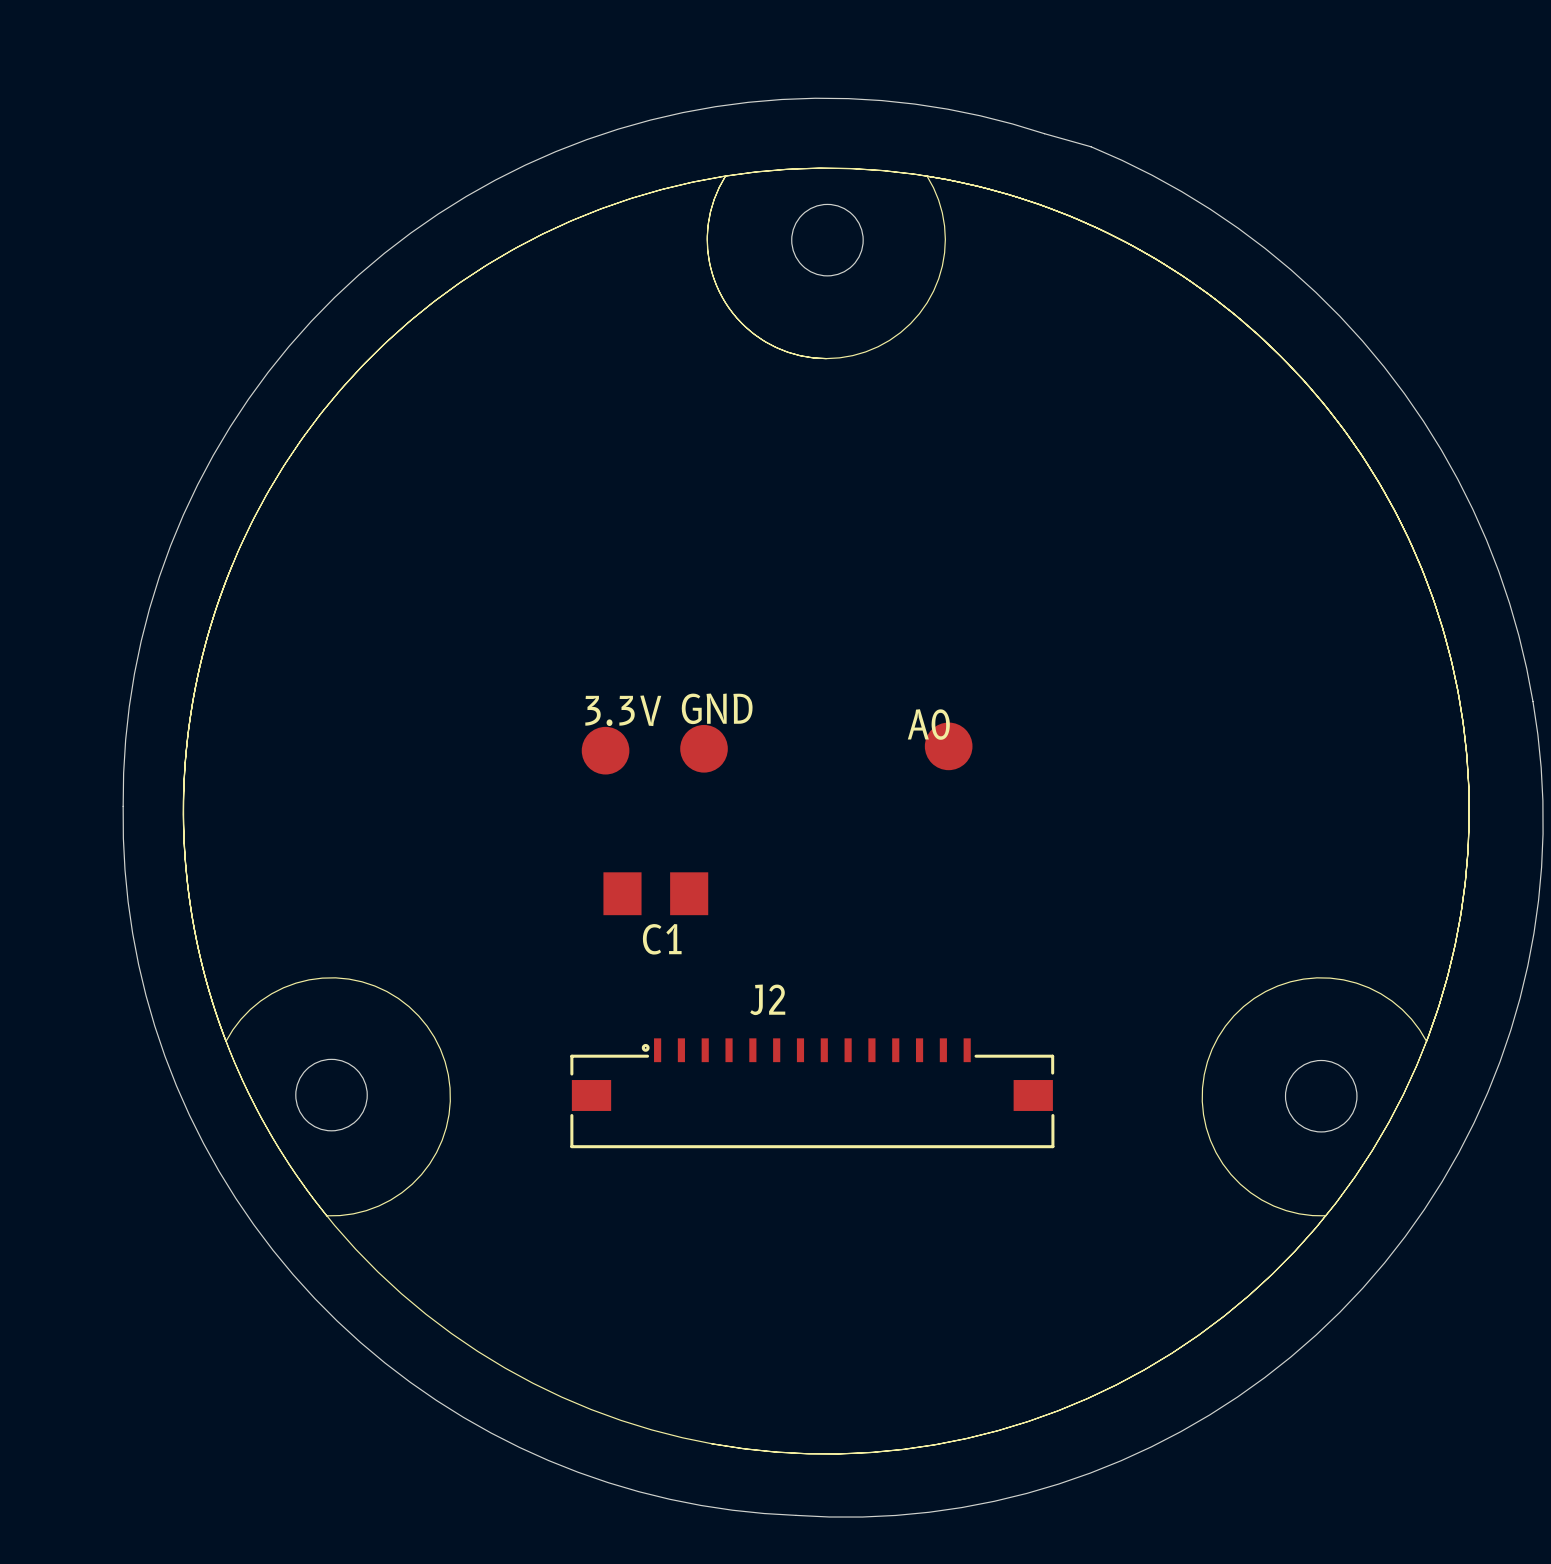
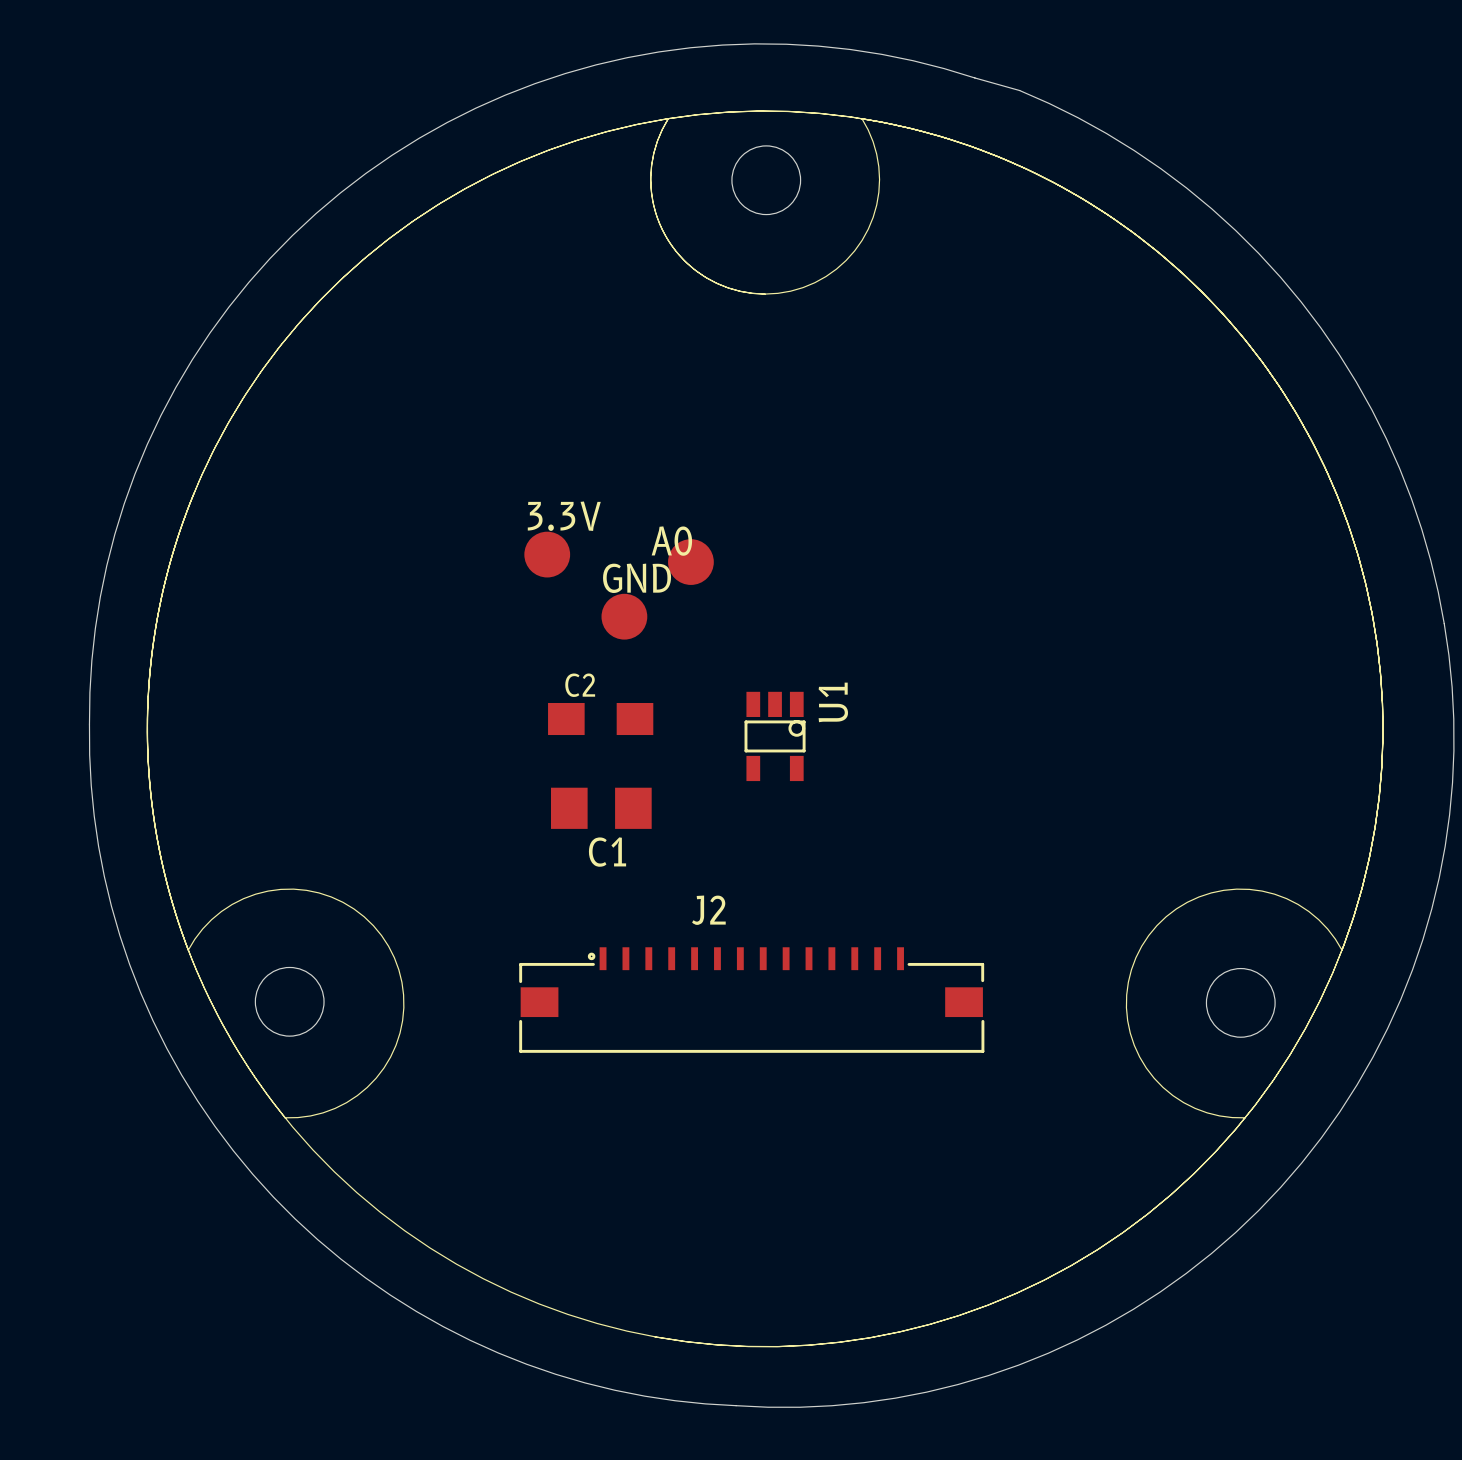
A0 position: (948, 746) -> (690, 562)
GND position: (704, 748) -> (624, 616)
3.3V position: (605, 750) -> (547, 554)
C2: none -> (600, 719)
U1: none -> (775, 736)

